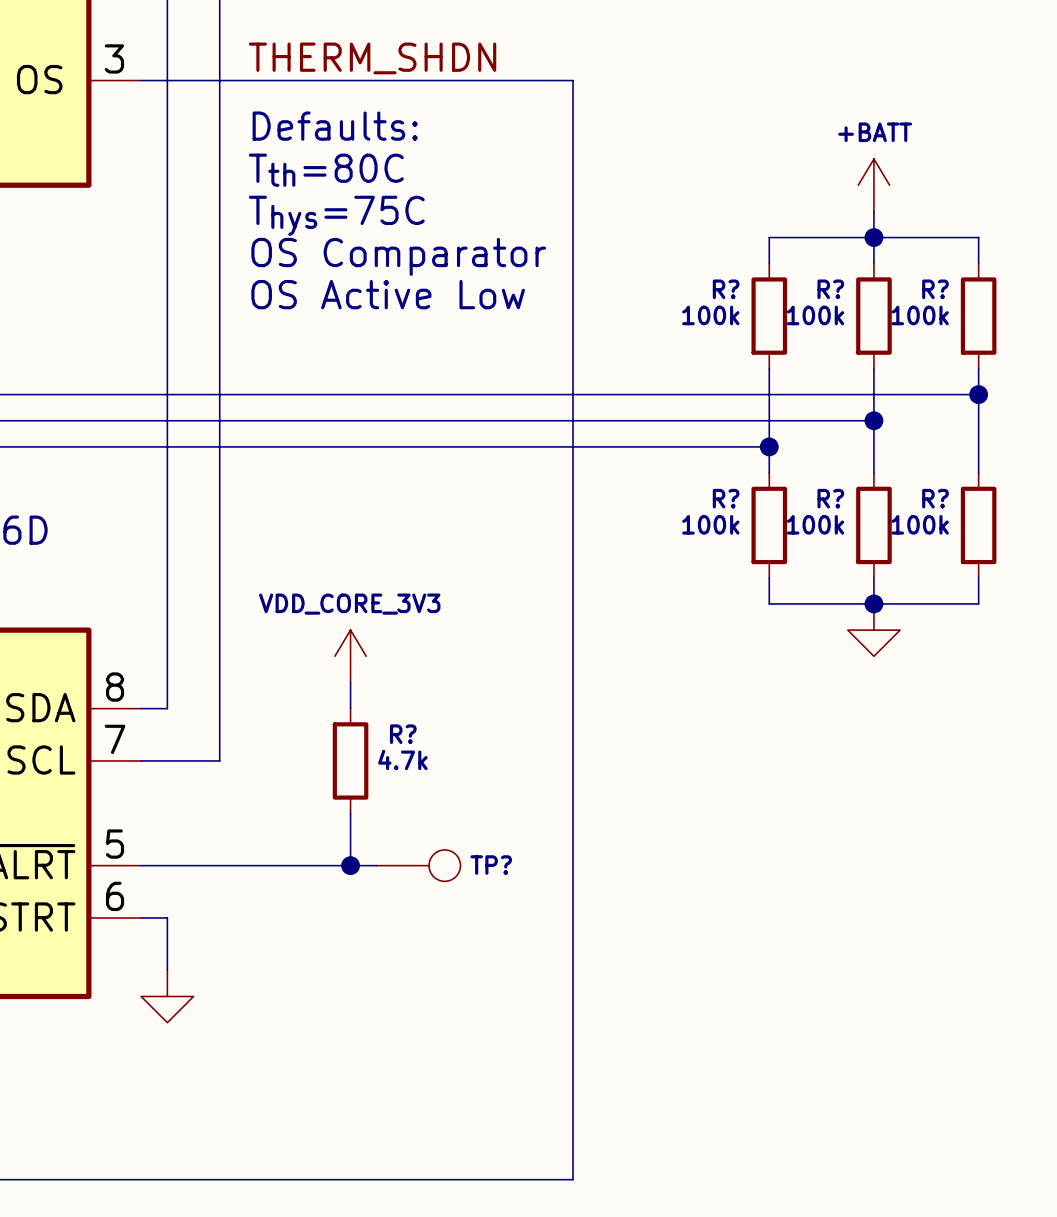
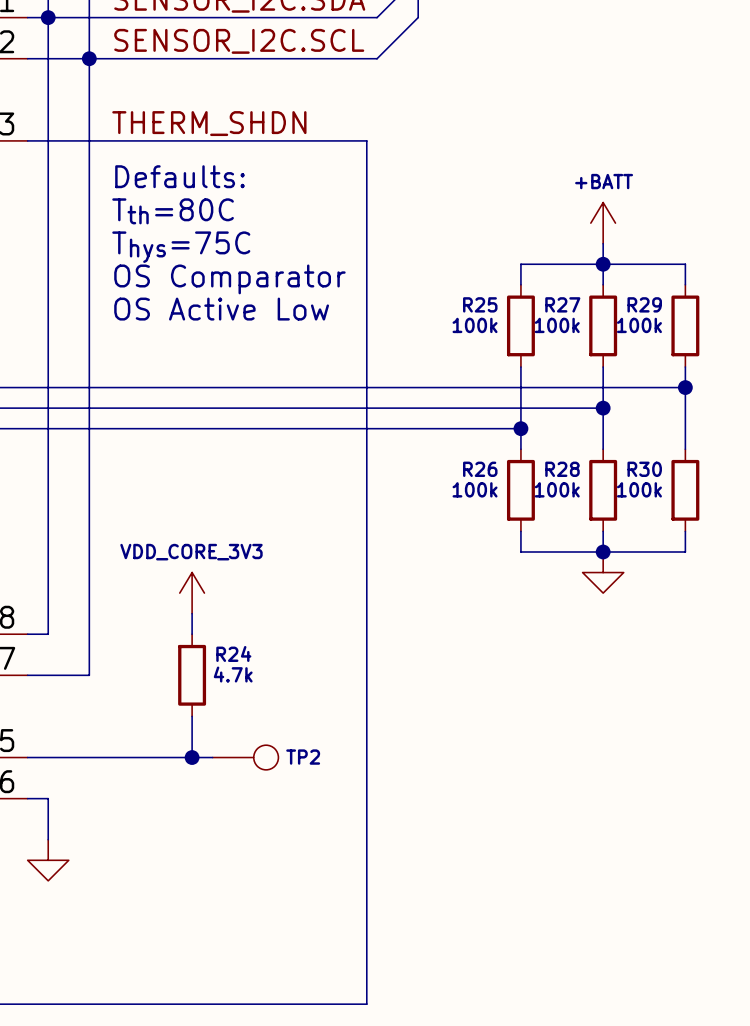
R? name: R? (726, 289) -> R25 (480, 304)
R? name: R? (830, 289) -> R27 (562, 304)
R? name: R? (935, 289) -> R29 (644, 304)
R? name: R? (726, 498) -> R26 (480, 469)
R? name: R? (830, 498) -> R28 (562, 469)
R? name: R? (935, 498) -> R30 (644, 469)
R? name: R? (403, 734) -> R24 (233, 653)
TP? name: TP? (491, 865) -> TP2 (303, 757)

